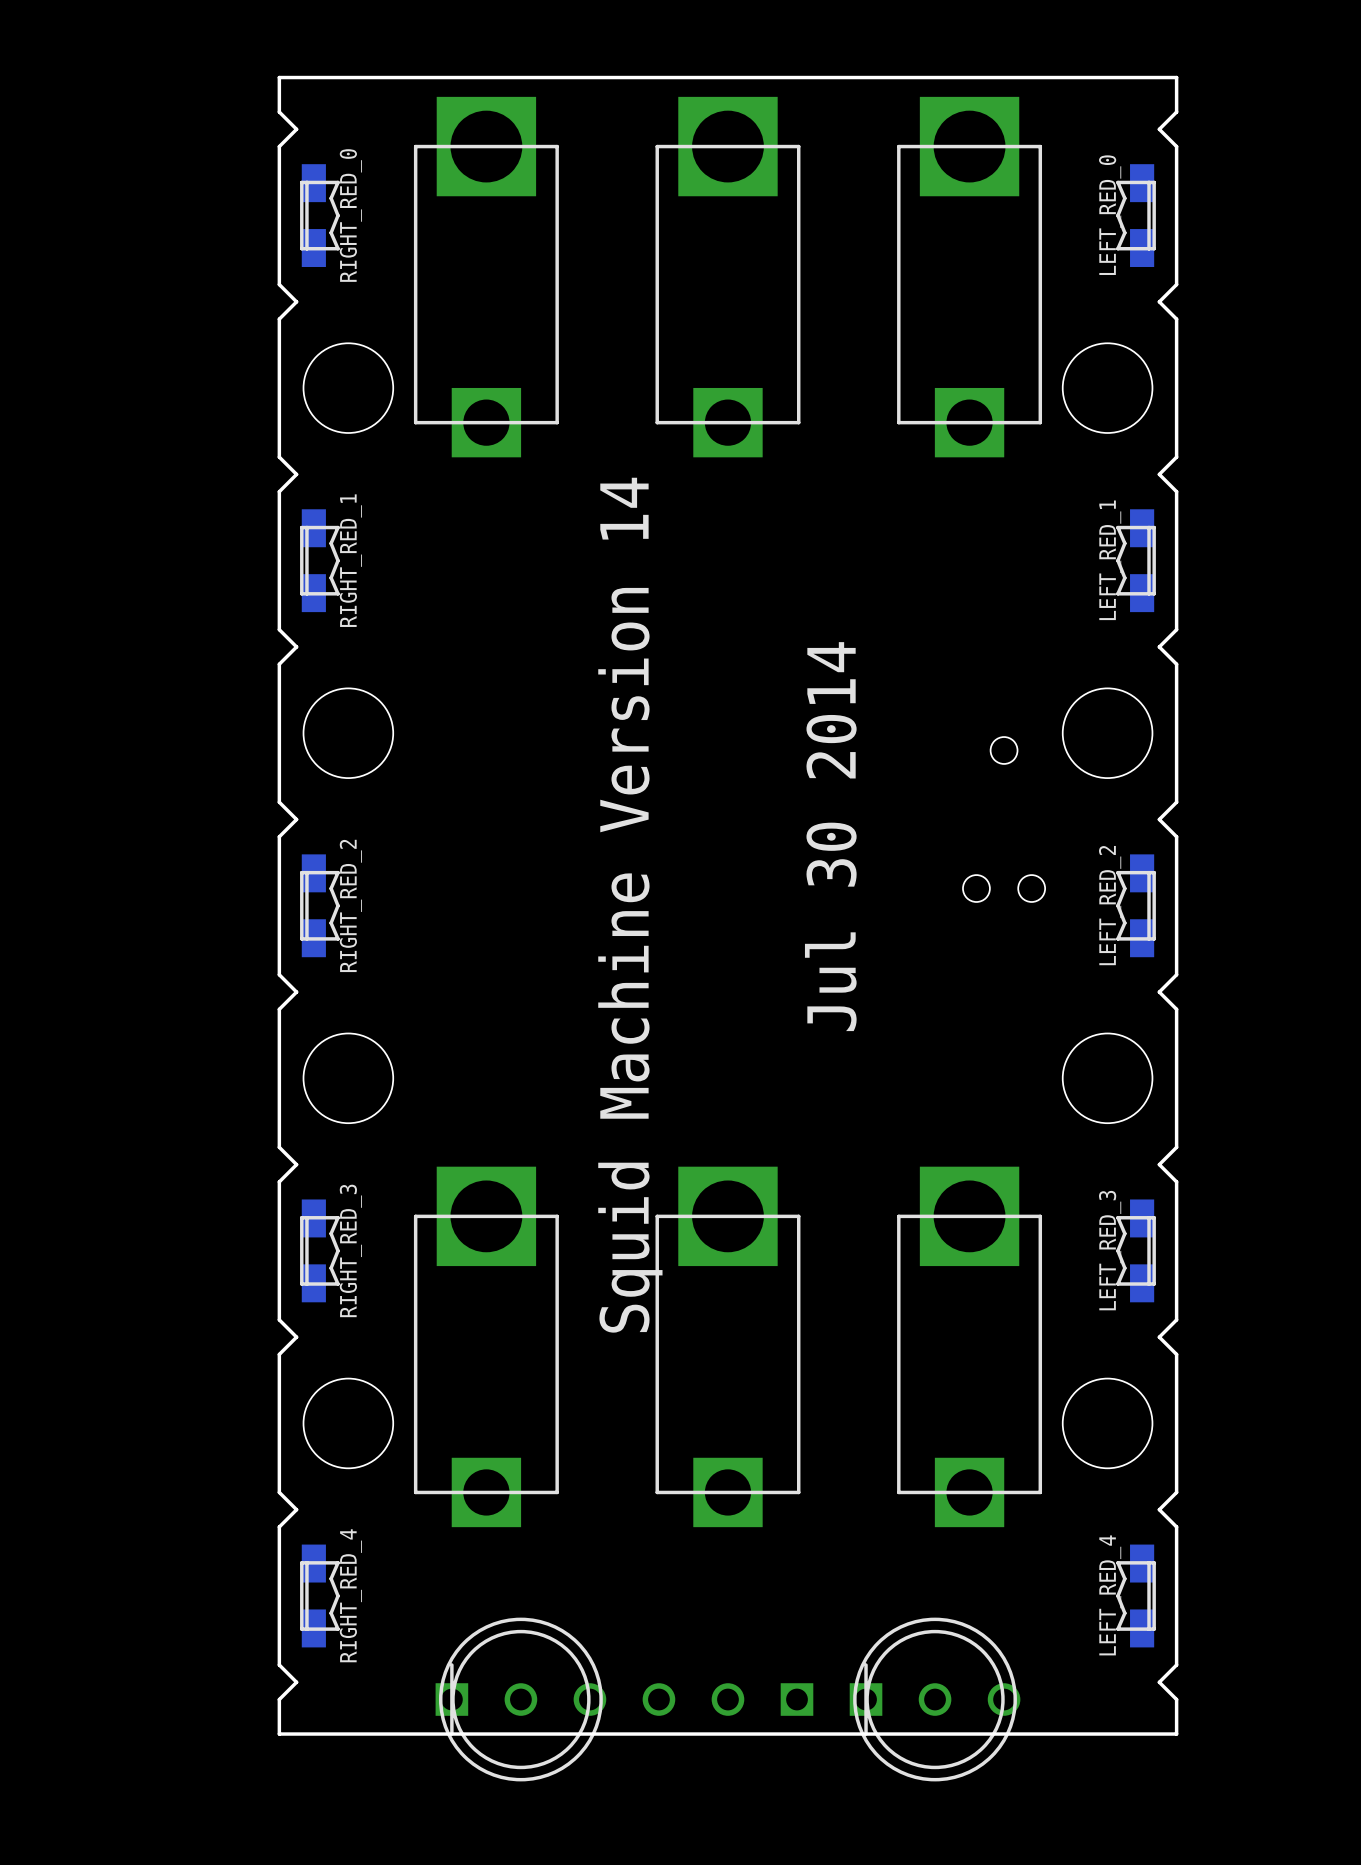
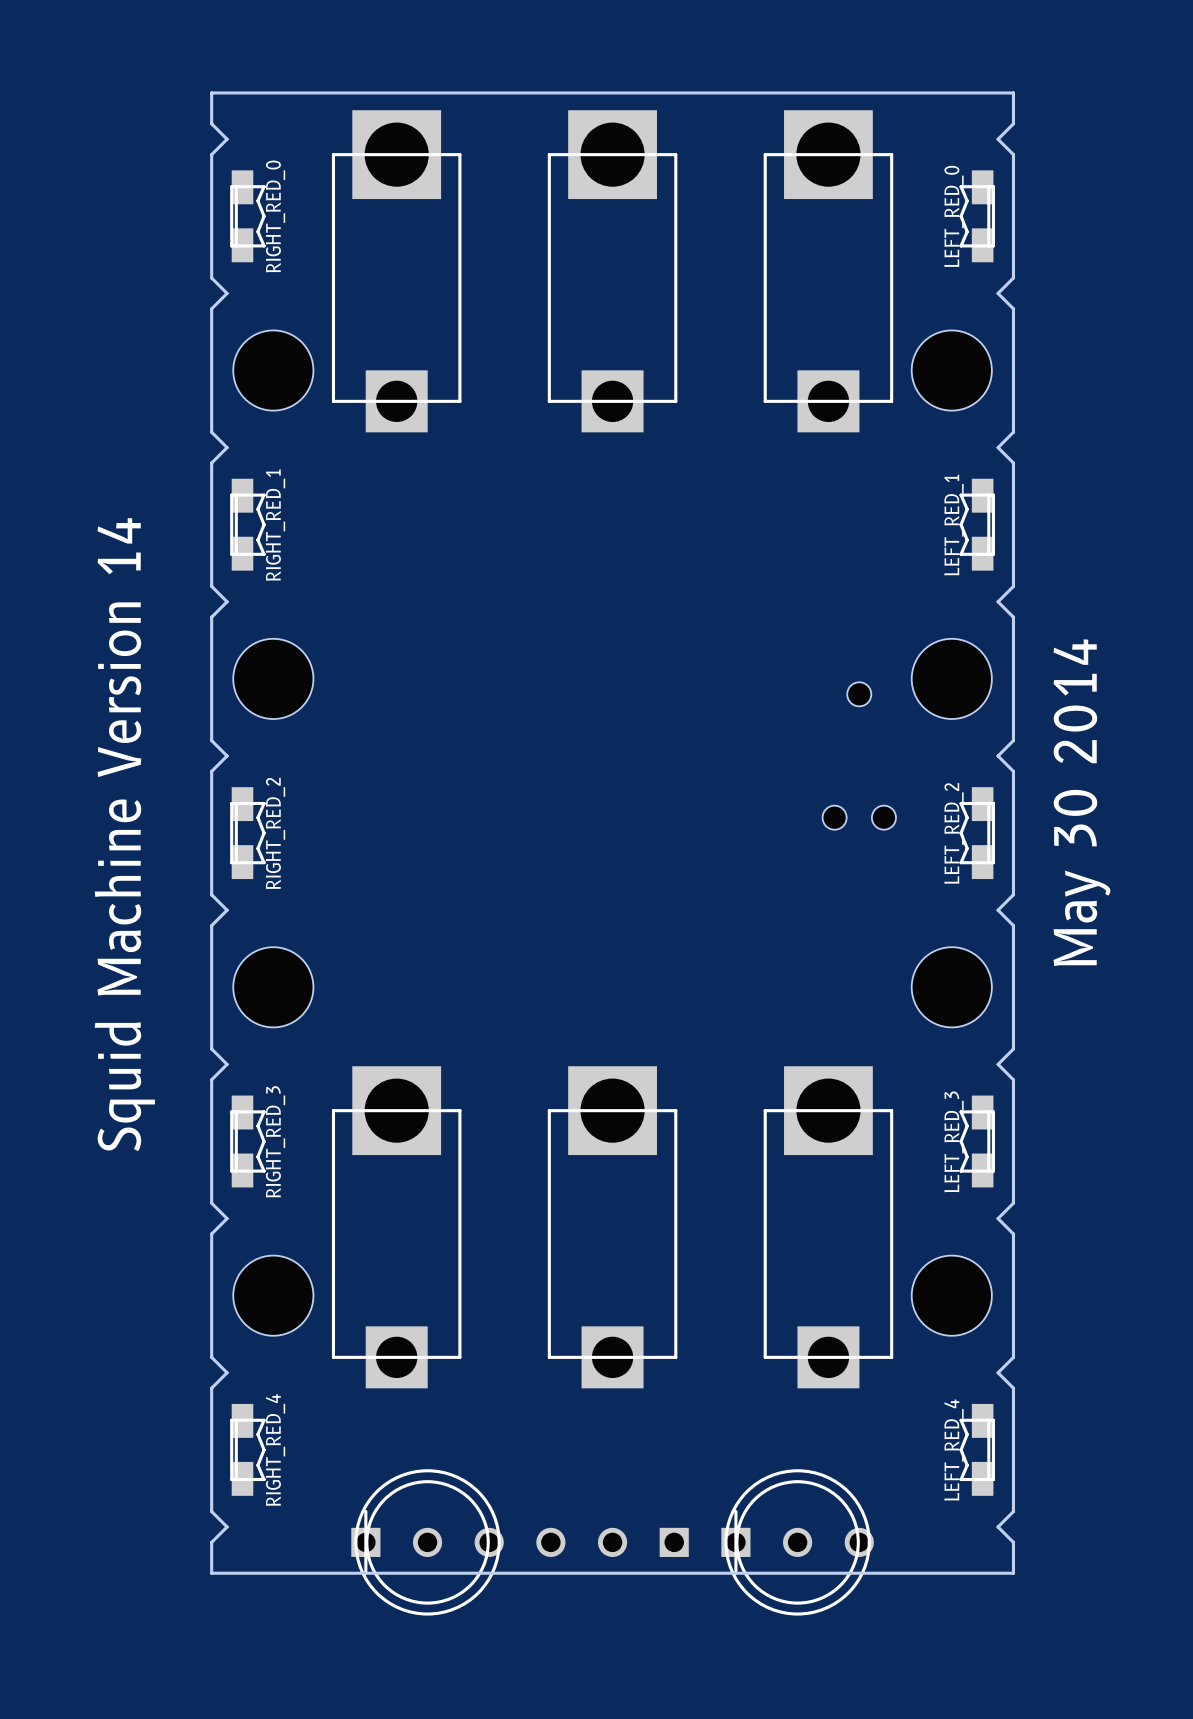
text: Jul 30 2014 (830, 836) -> none
text: none -> May 30 2014 (1081, 802)
text position: Squid Machine Version 14 (630, 905) -> Squid Machine Version 14 (124, 834)

